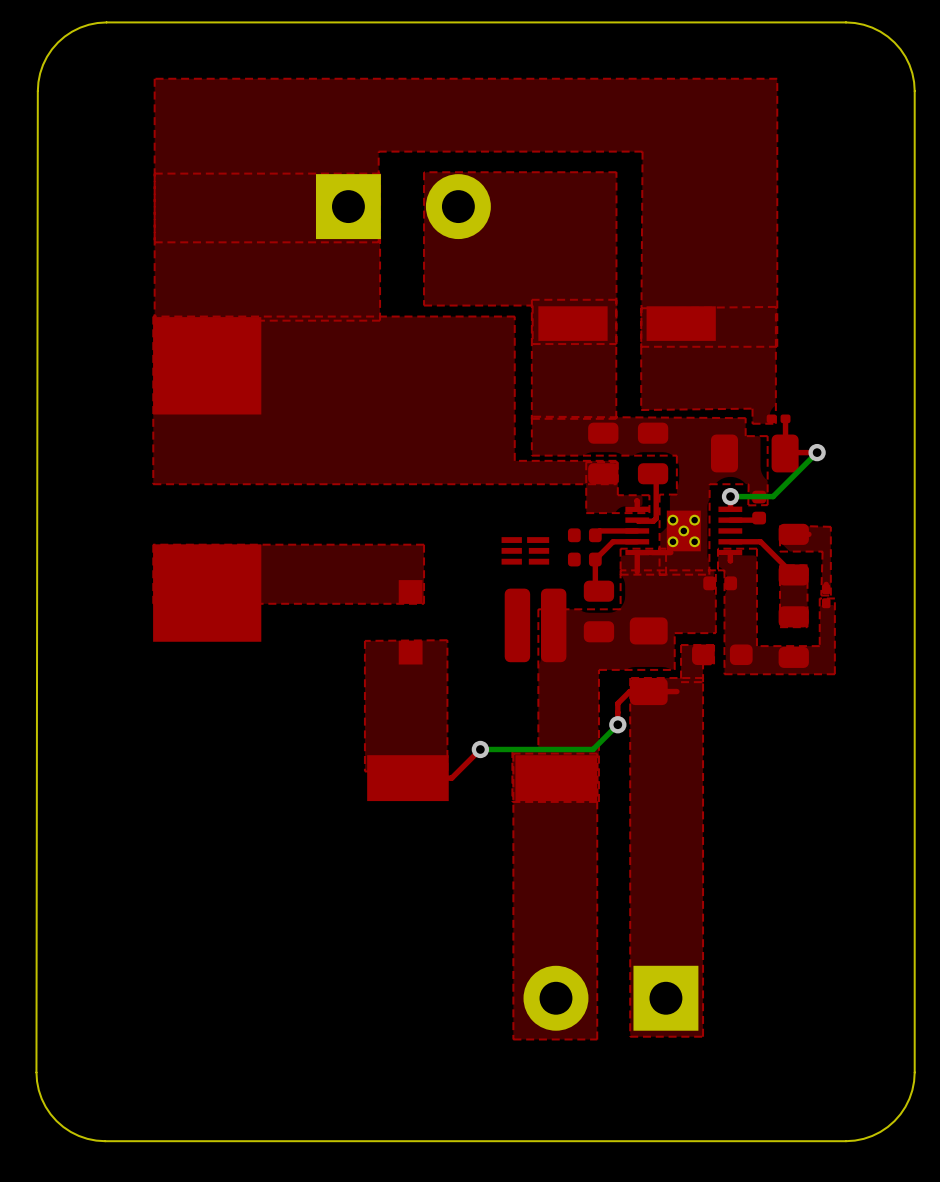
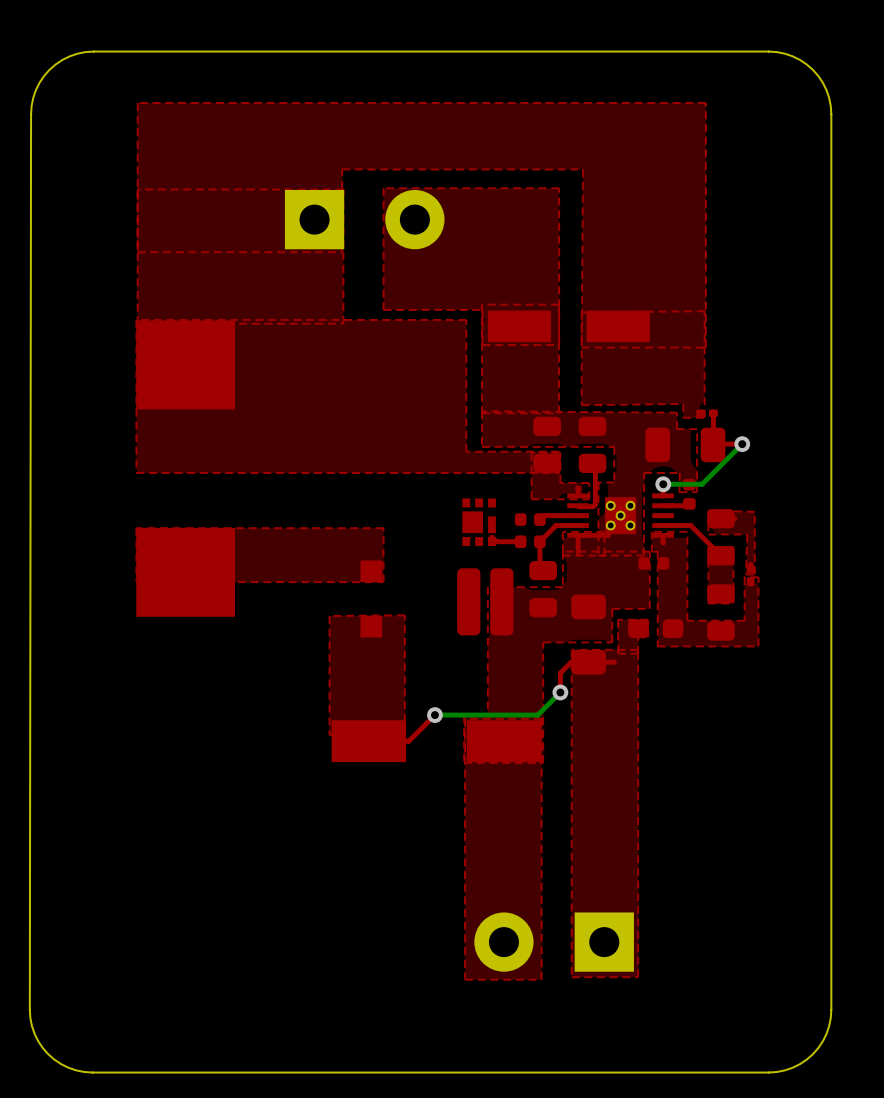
part footprint: [501, 537, 550, 565] -> [462, 498, 496, 547]
top track: none -> (491, 537) (496, 541) (520, 541)

